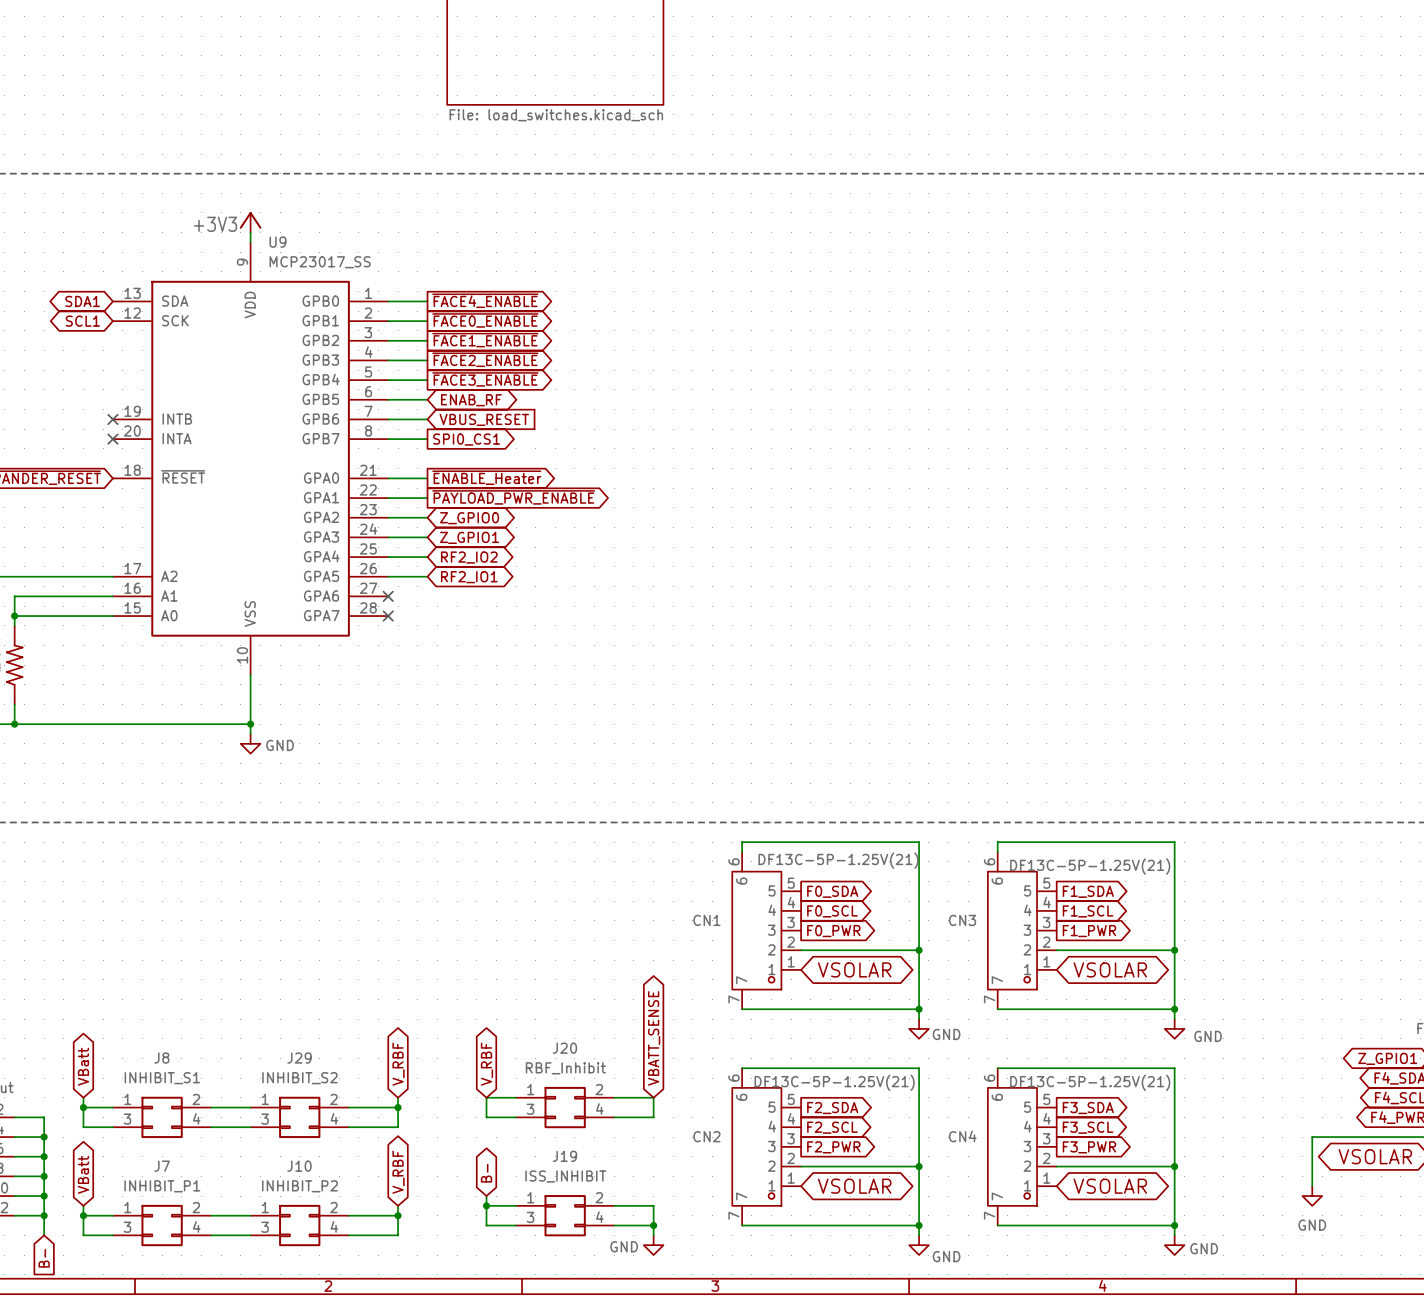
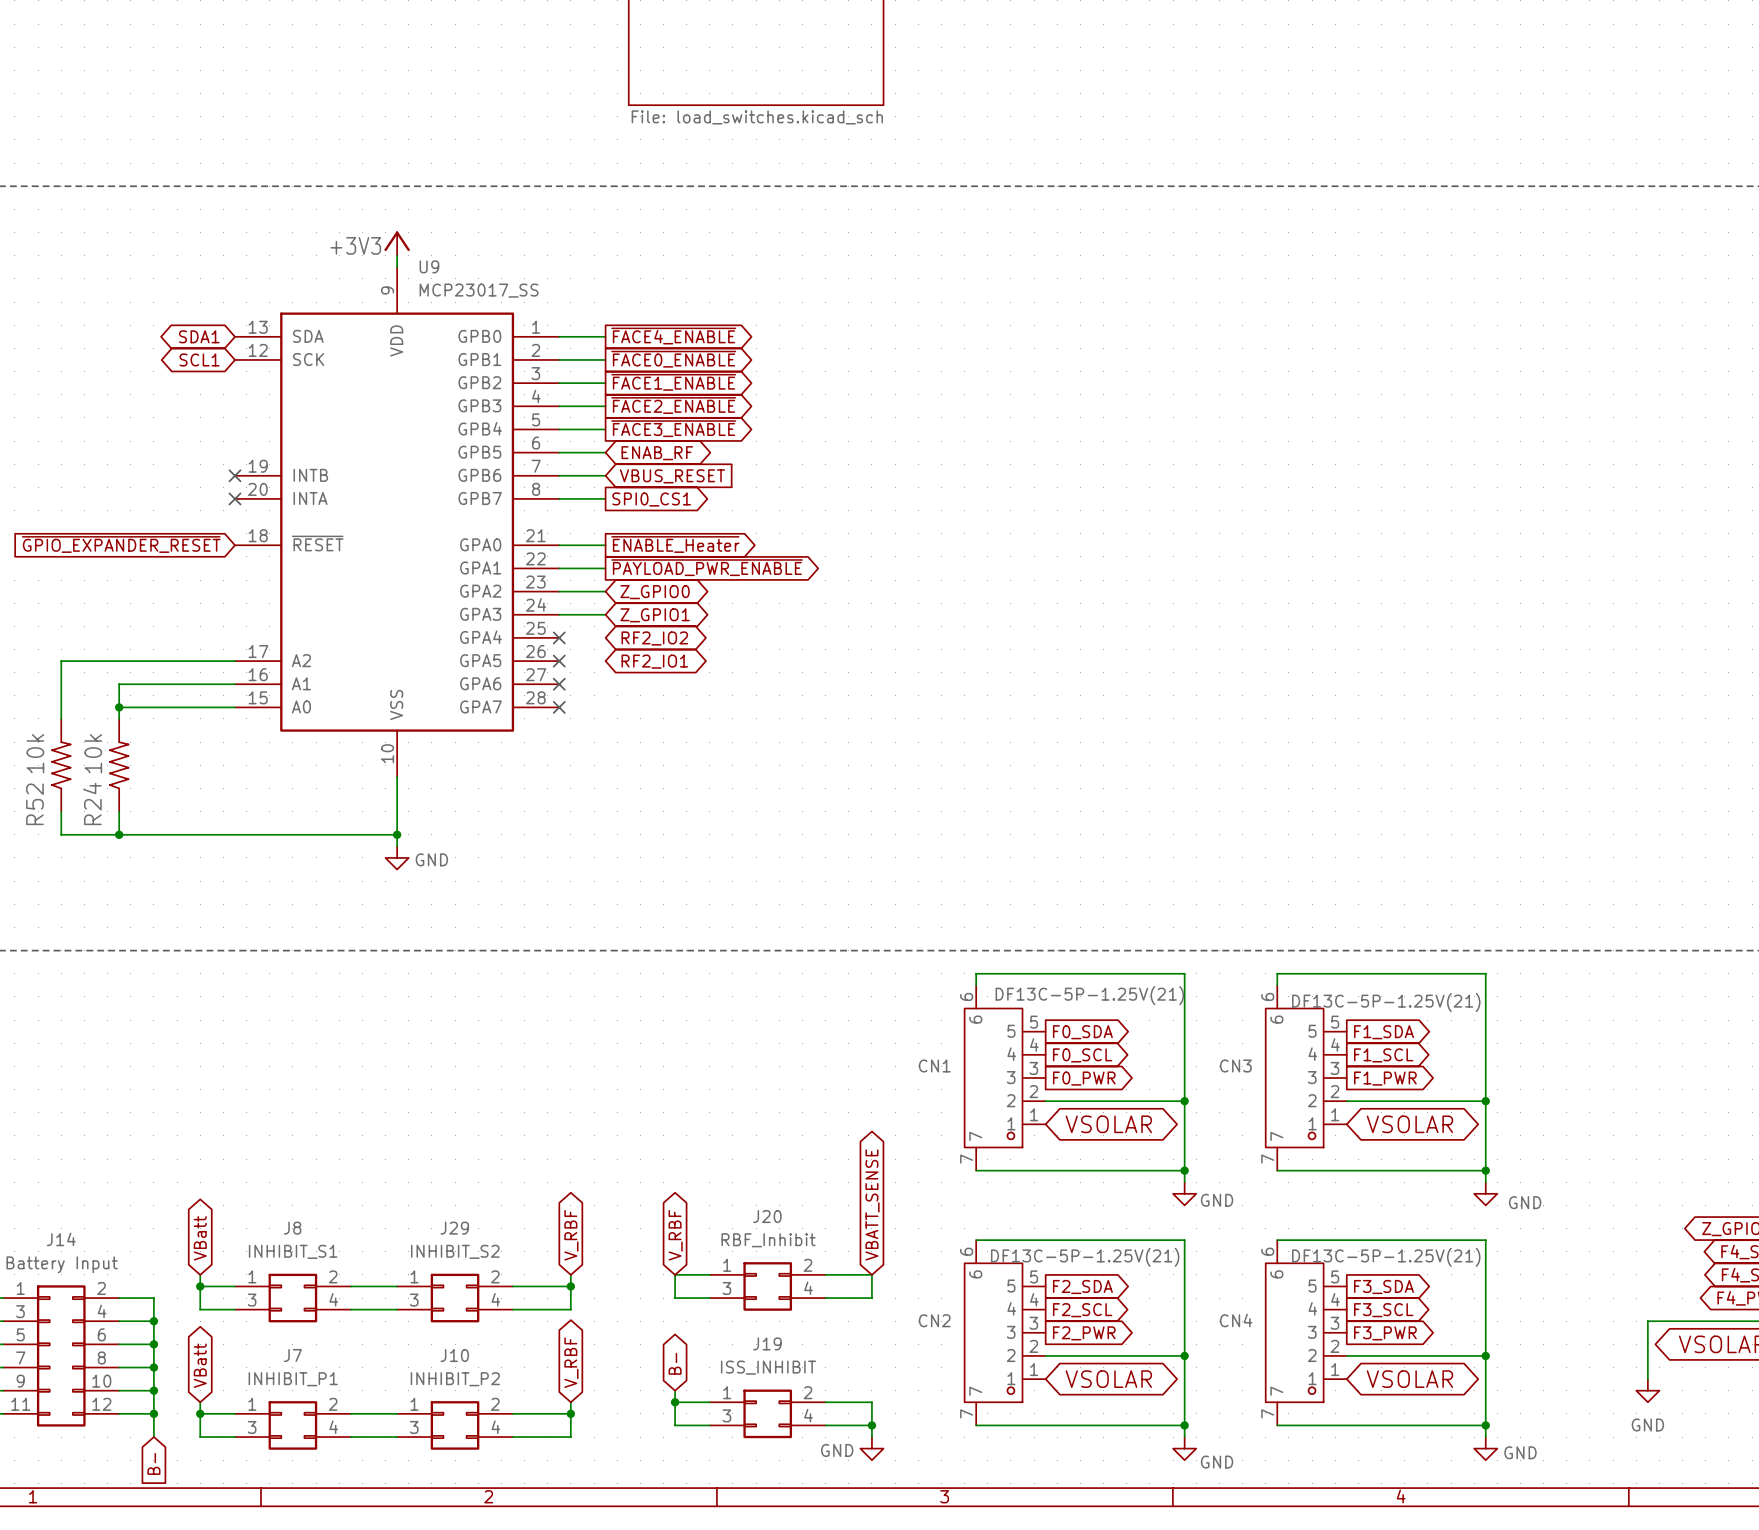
wire: (388, 557) (427, 557) -> none
no-connect mark: none -> (559, 637)
wire: (388, 576) (427, 576) -> none
no-connect mark: none -> (559, 661)

